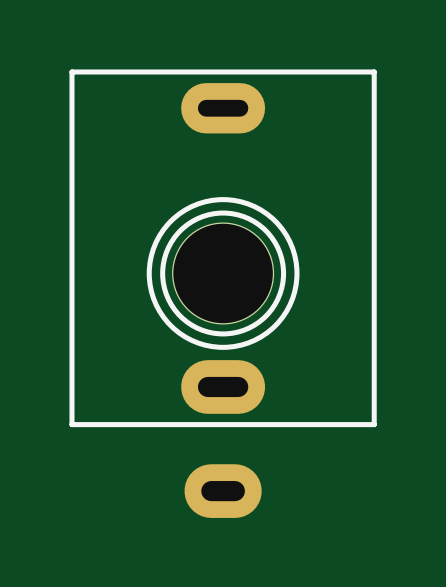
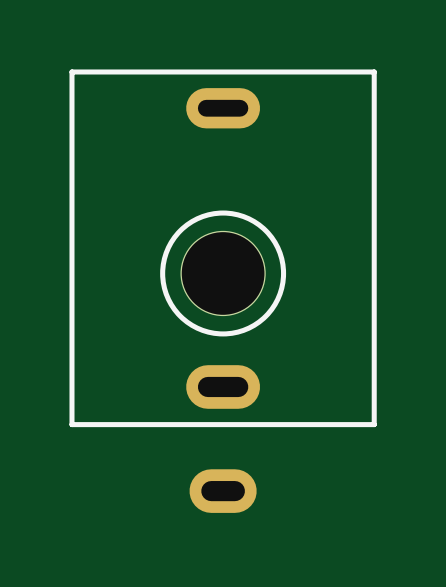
part footprint: [69, 69, 377, 518] -> [69, 69, 377, 513]

